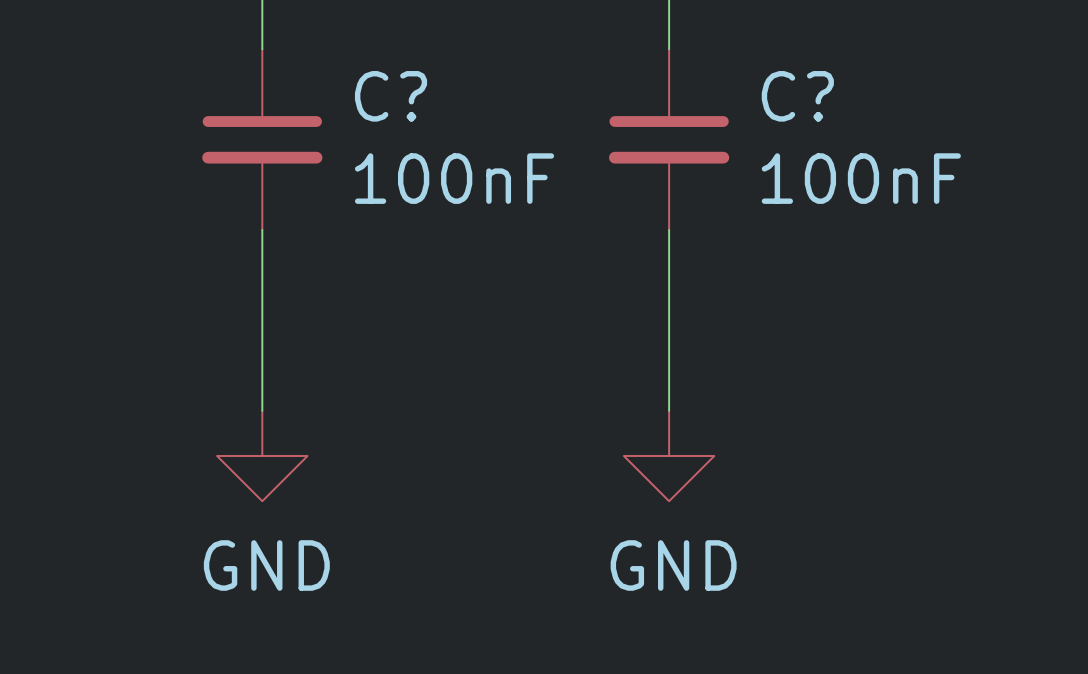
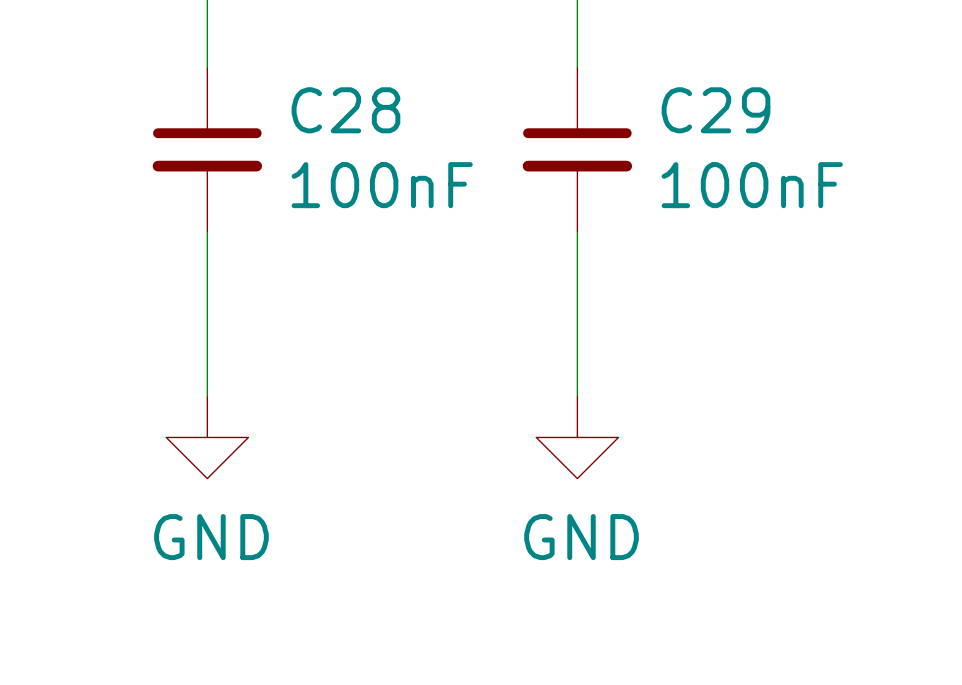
C? name: C? (391, 96) -> C28 (345, 110)
C? name: C? (797, 96) -> C29 (716, 110)

